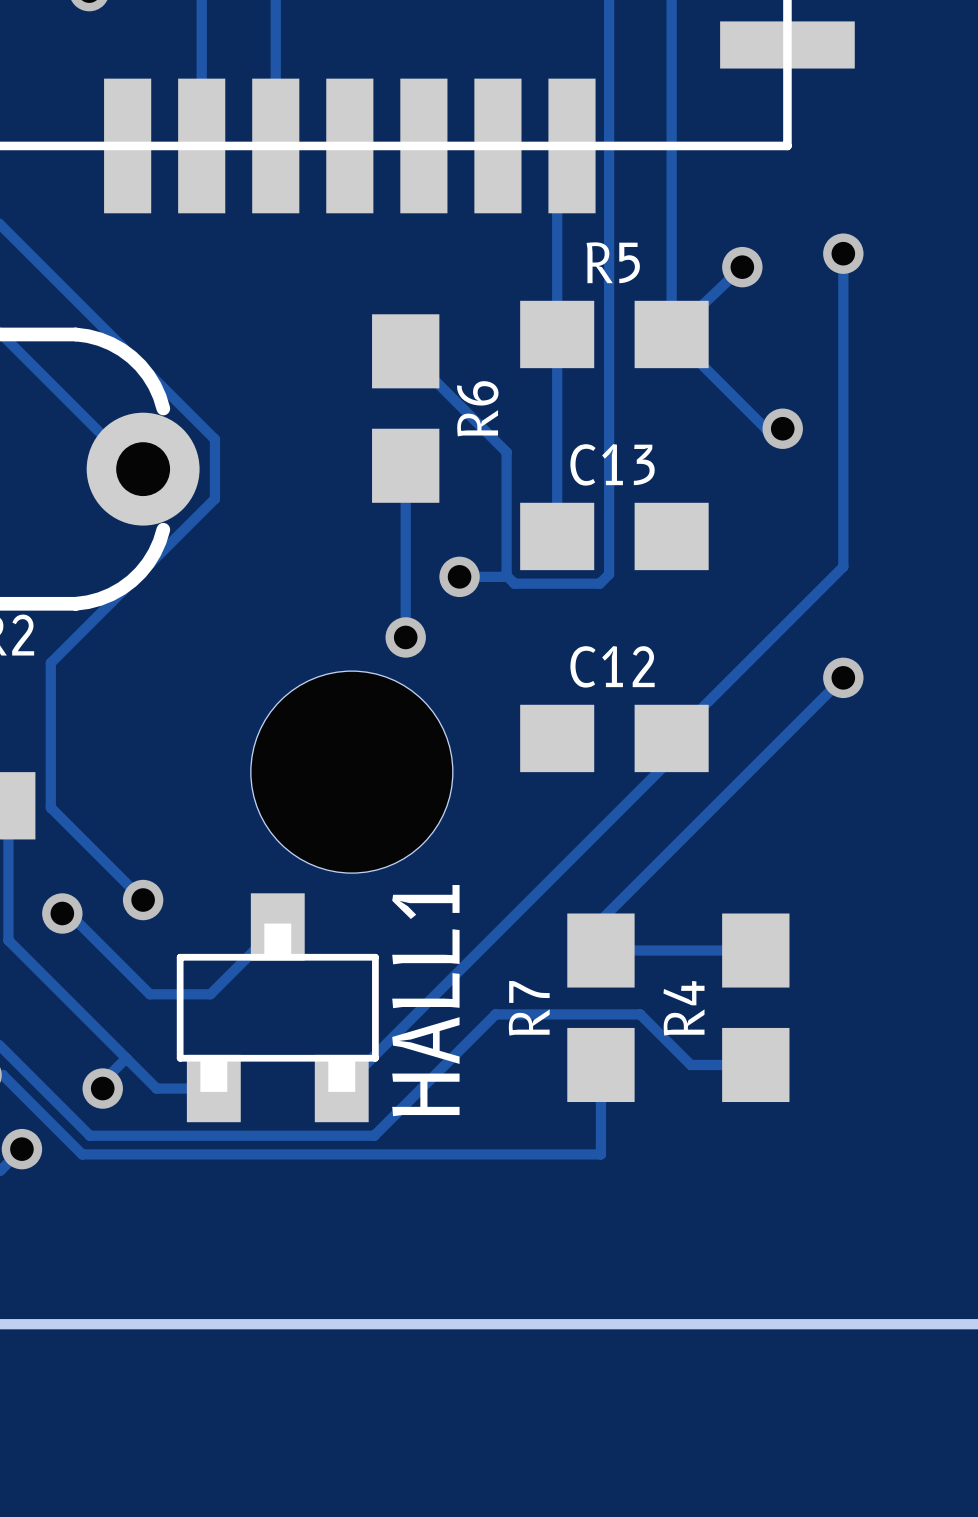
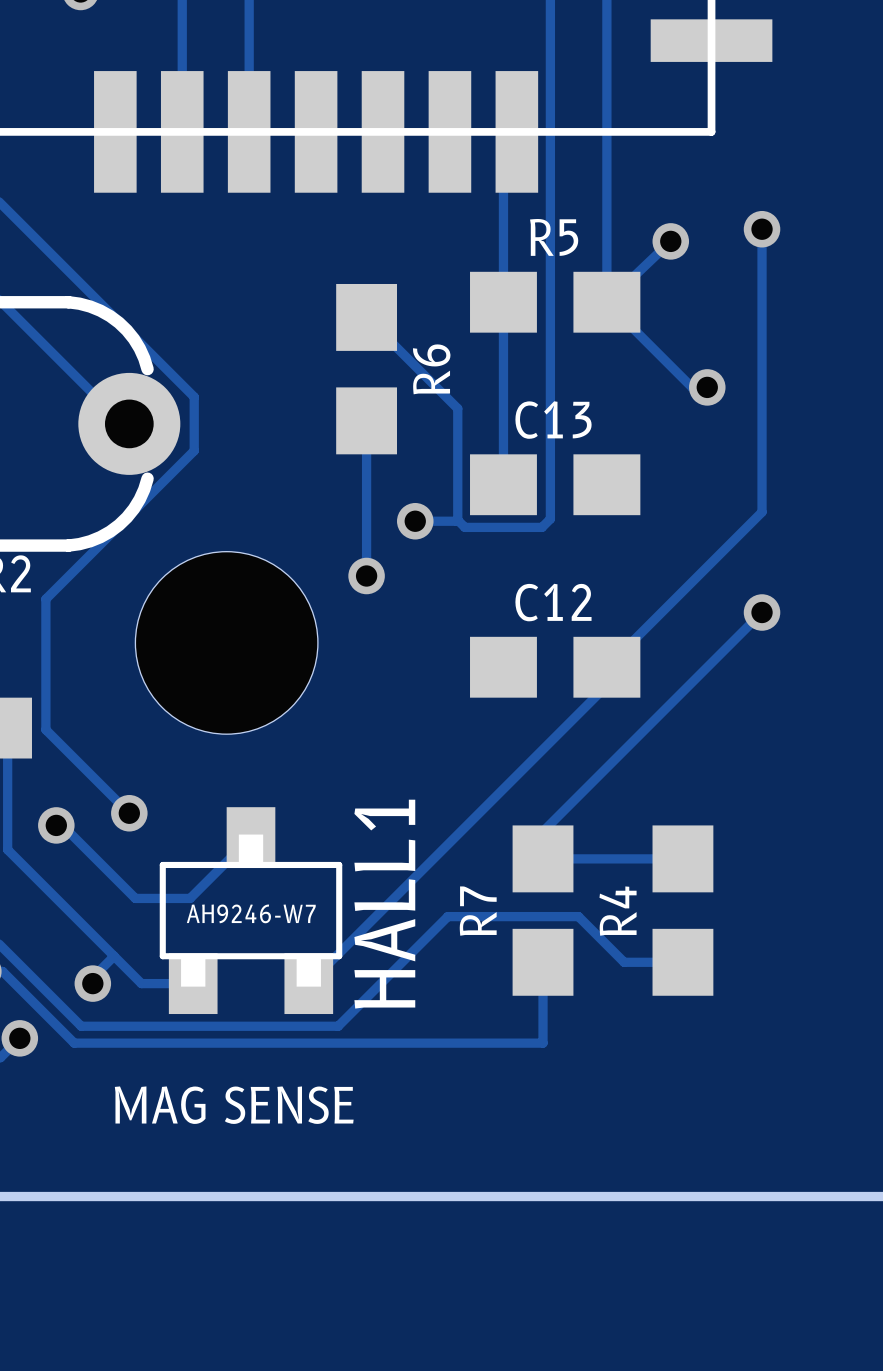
hole position: (351, 772) -> (226, 642)
text: none -> AH9246-W7 (251, 913)
text: none -> MAG SENSE (234, 1105)

